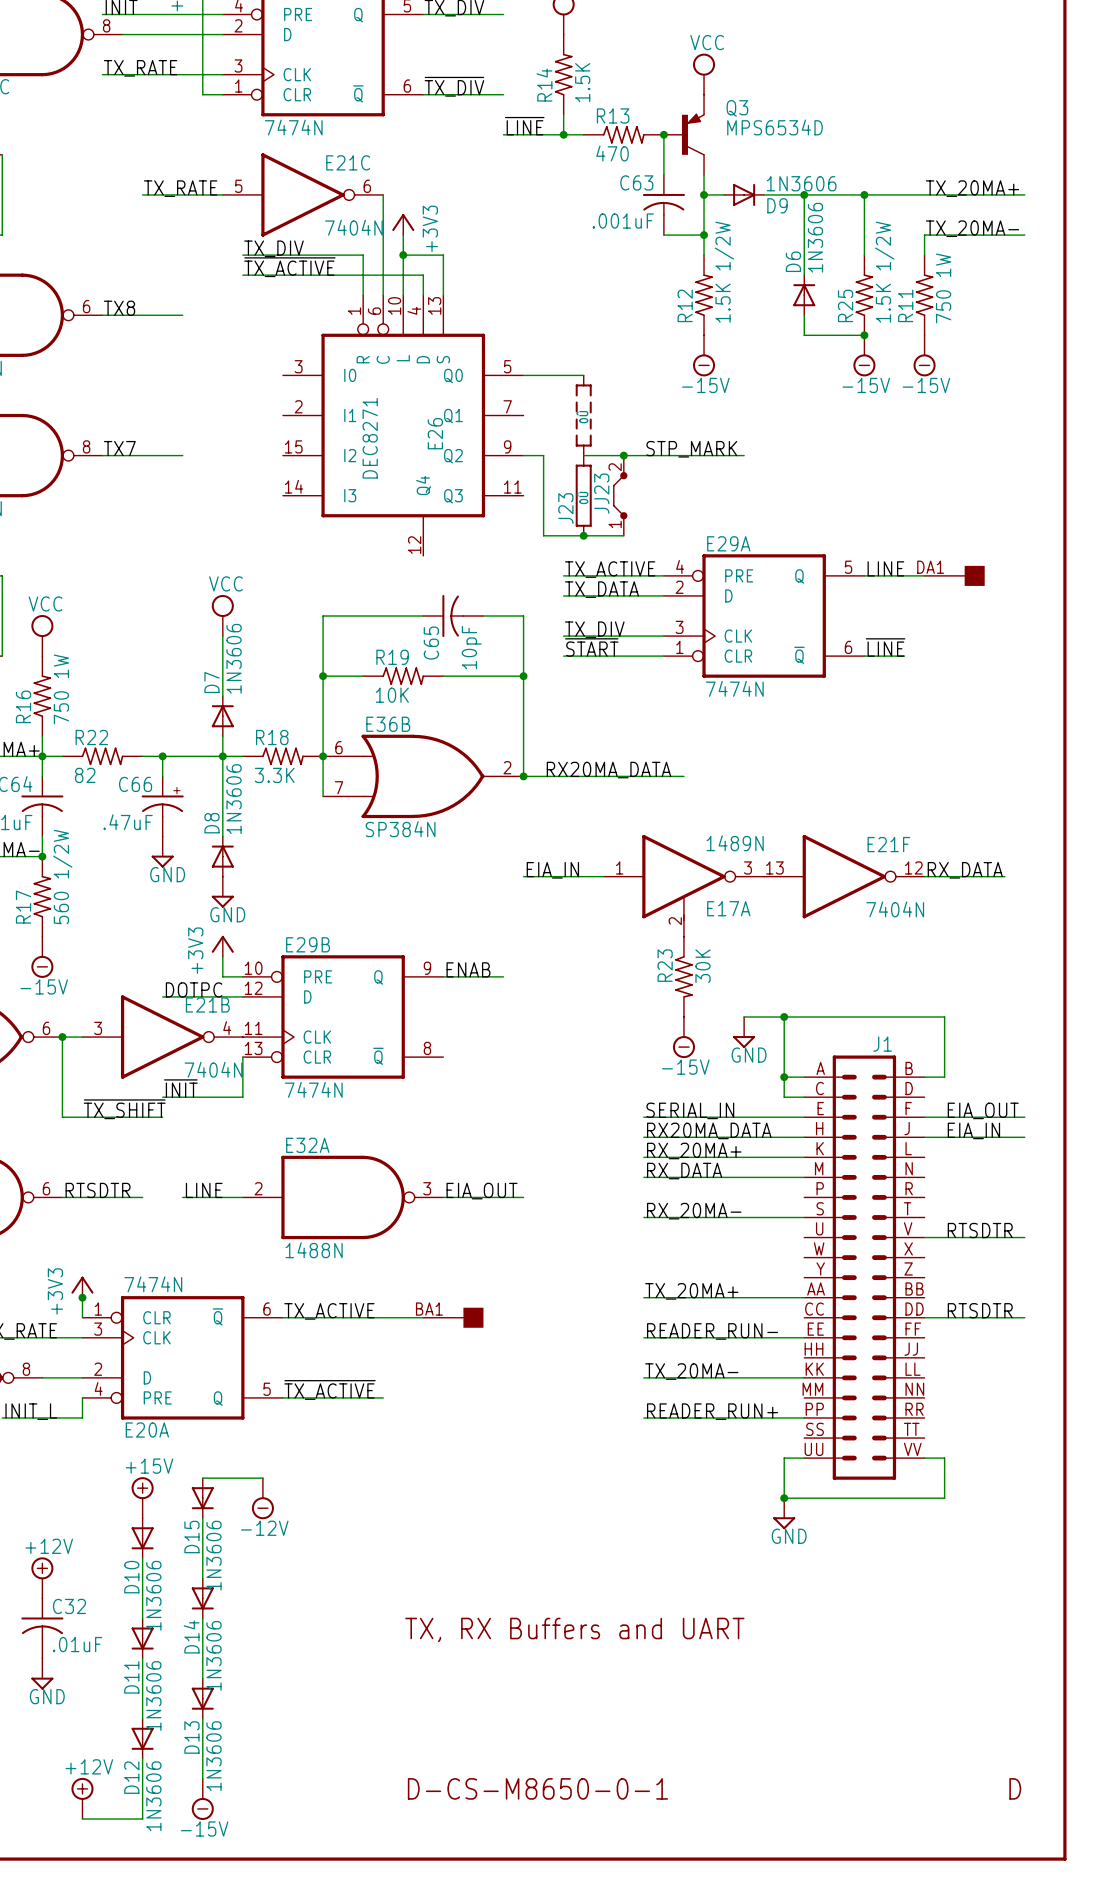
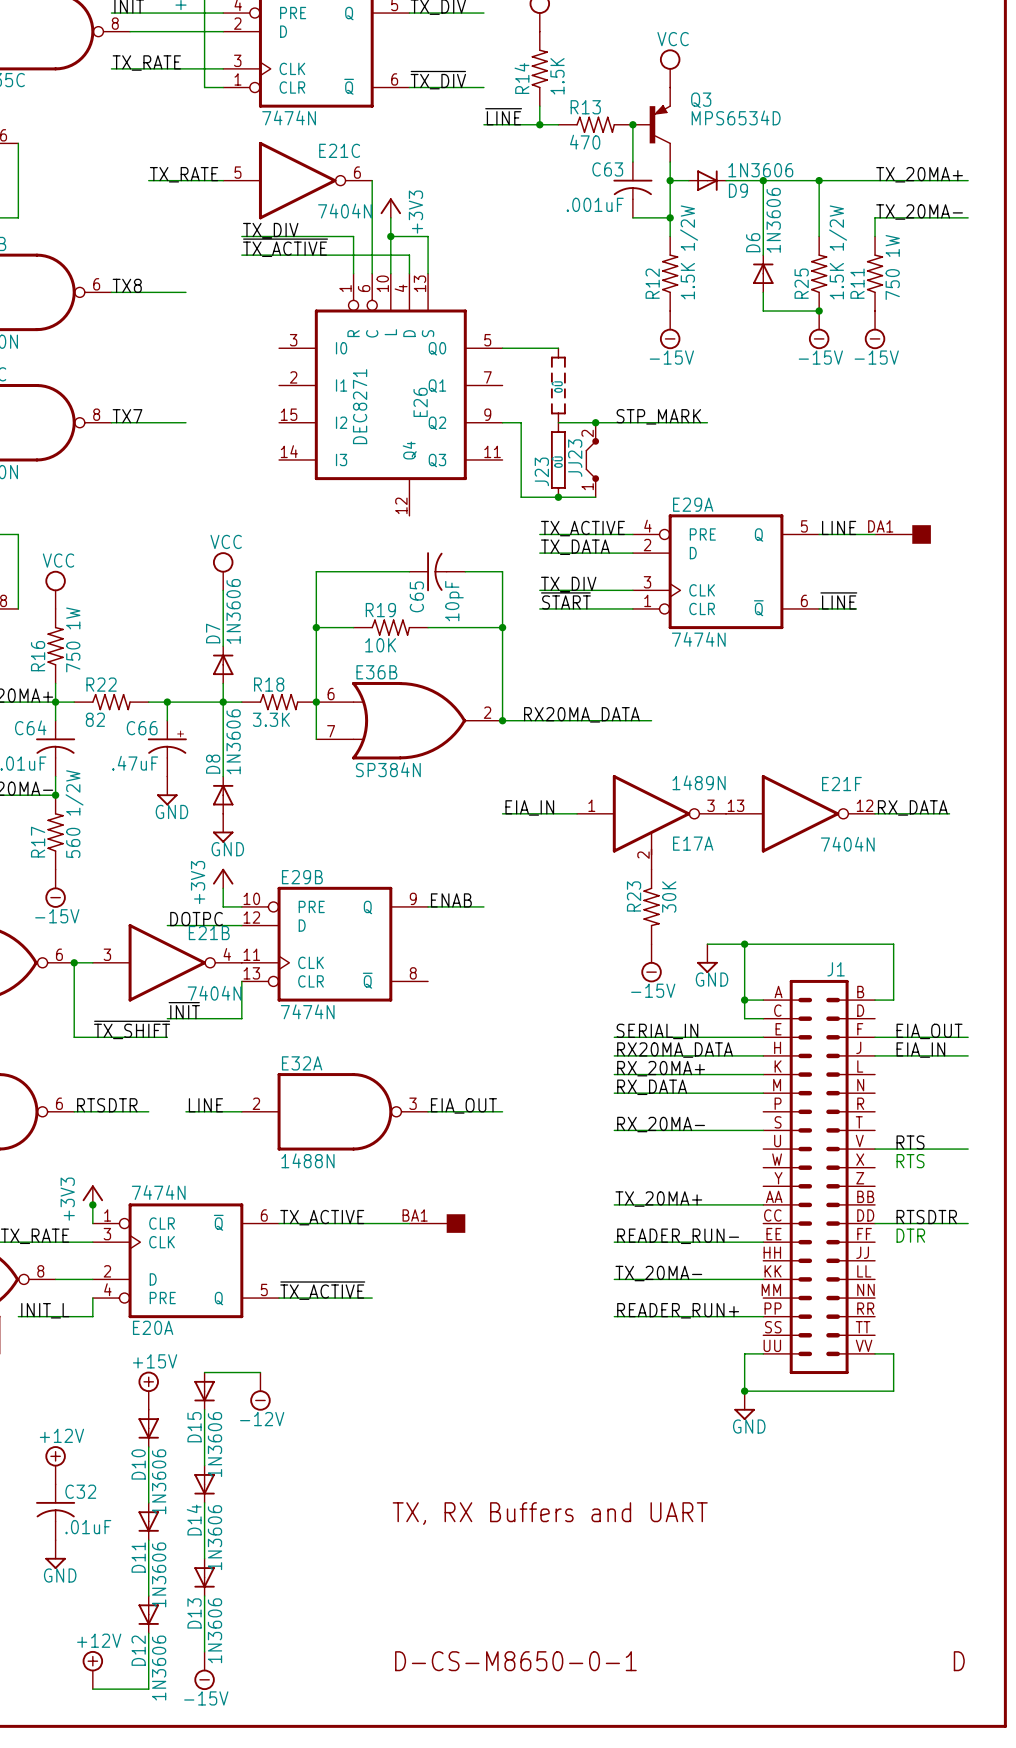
label: RTSDTR (980, 1230) -> RTS (910, 1142)
text: none -> RTS (910, 1161)
text: none -> DTR (910, 1235)

